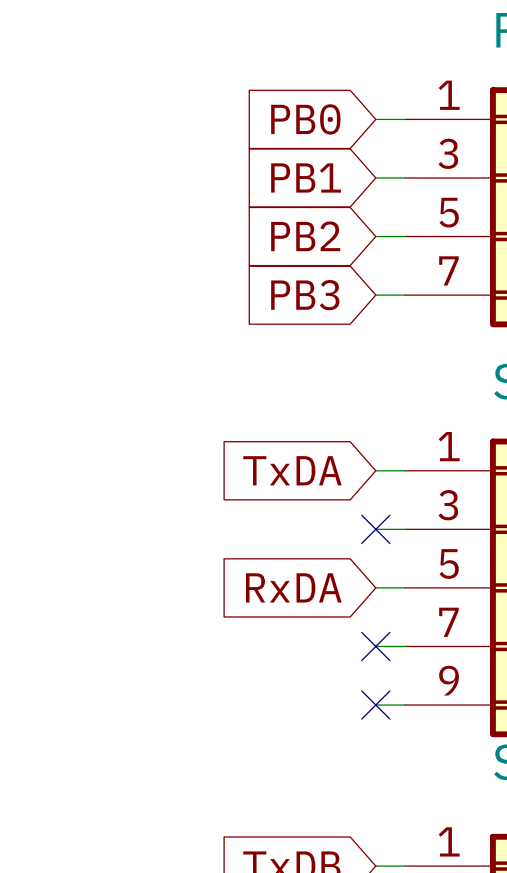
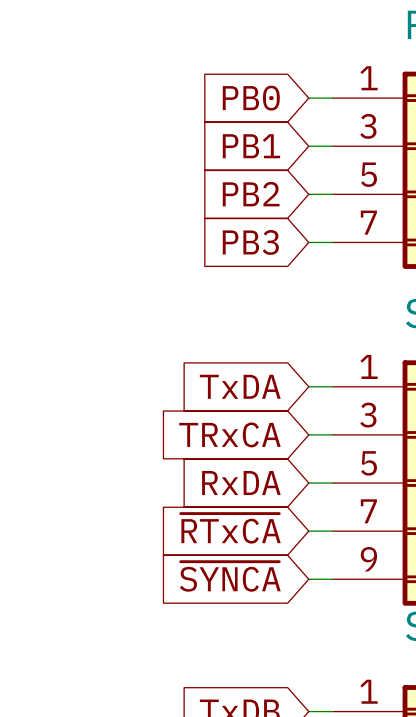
global label: none -> TRxCA (229, 434)
no-connect mark: (375, 529) -> none
global label: none -> ~{RTxCA} (230, 528)
no-connect mark: (375, 646) -> none
global label: none -> ~{SYNCA} (230, 576)
no-connect mark: (375, 705) -> none

